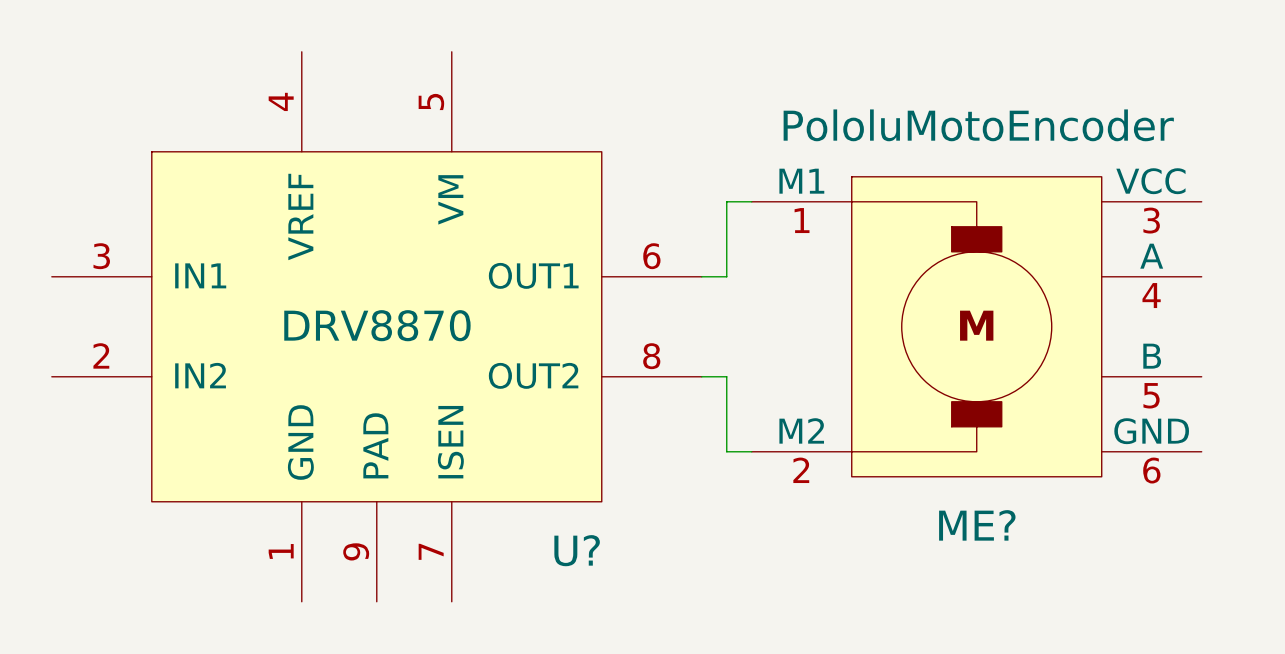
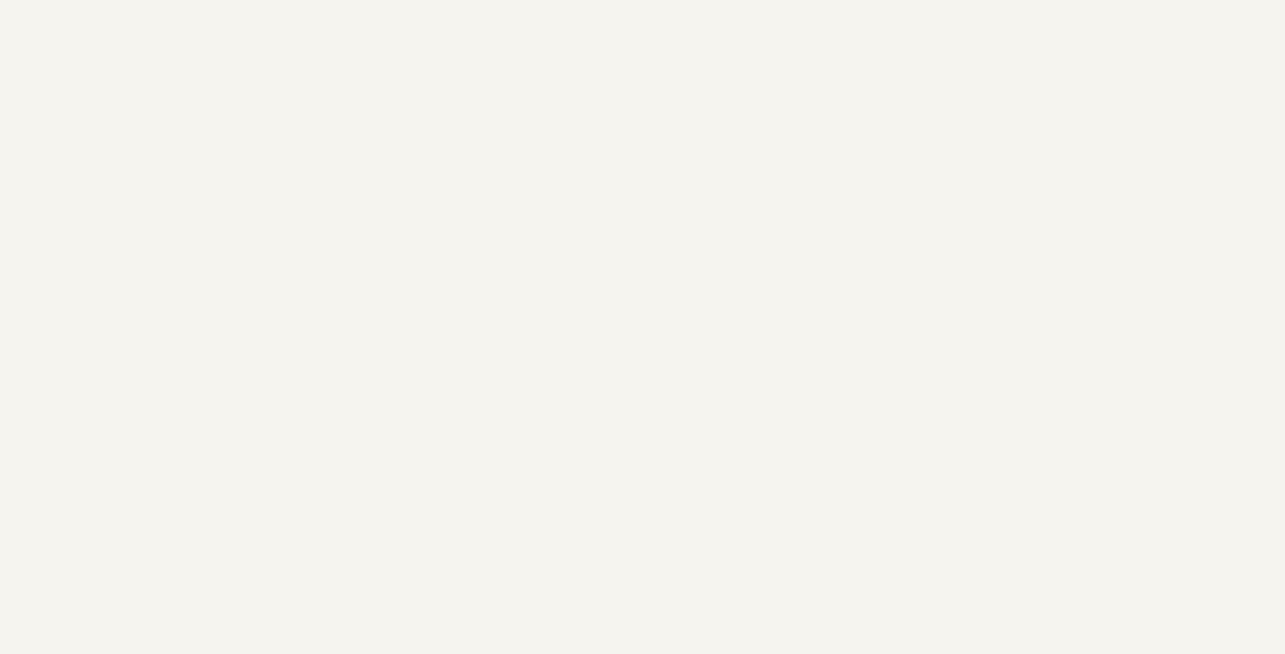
wire: (751, 201) (726, 201) (726, 276) (701, 276) -> none
U?: DRV8870 (376, 326) -> none
ME?: PololuMotoEncoder (976, 326) -> none
wire: (701, 376) (726, 376) (726, 451) (751, 451) -> none

